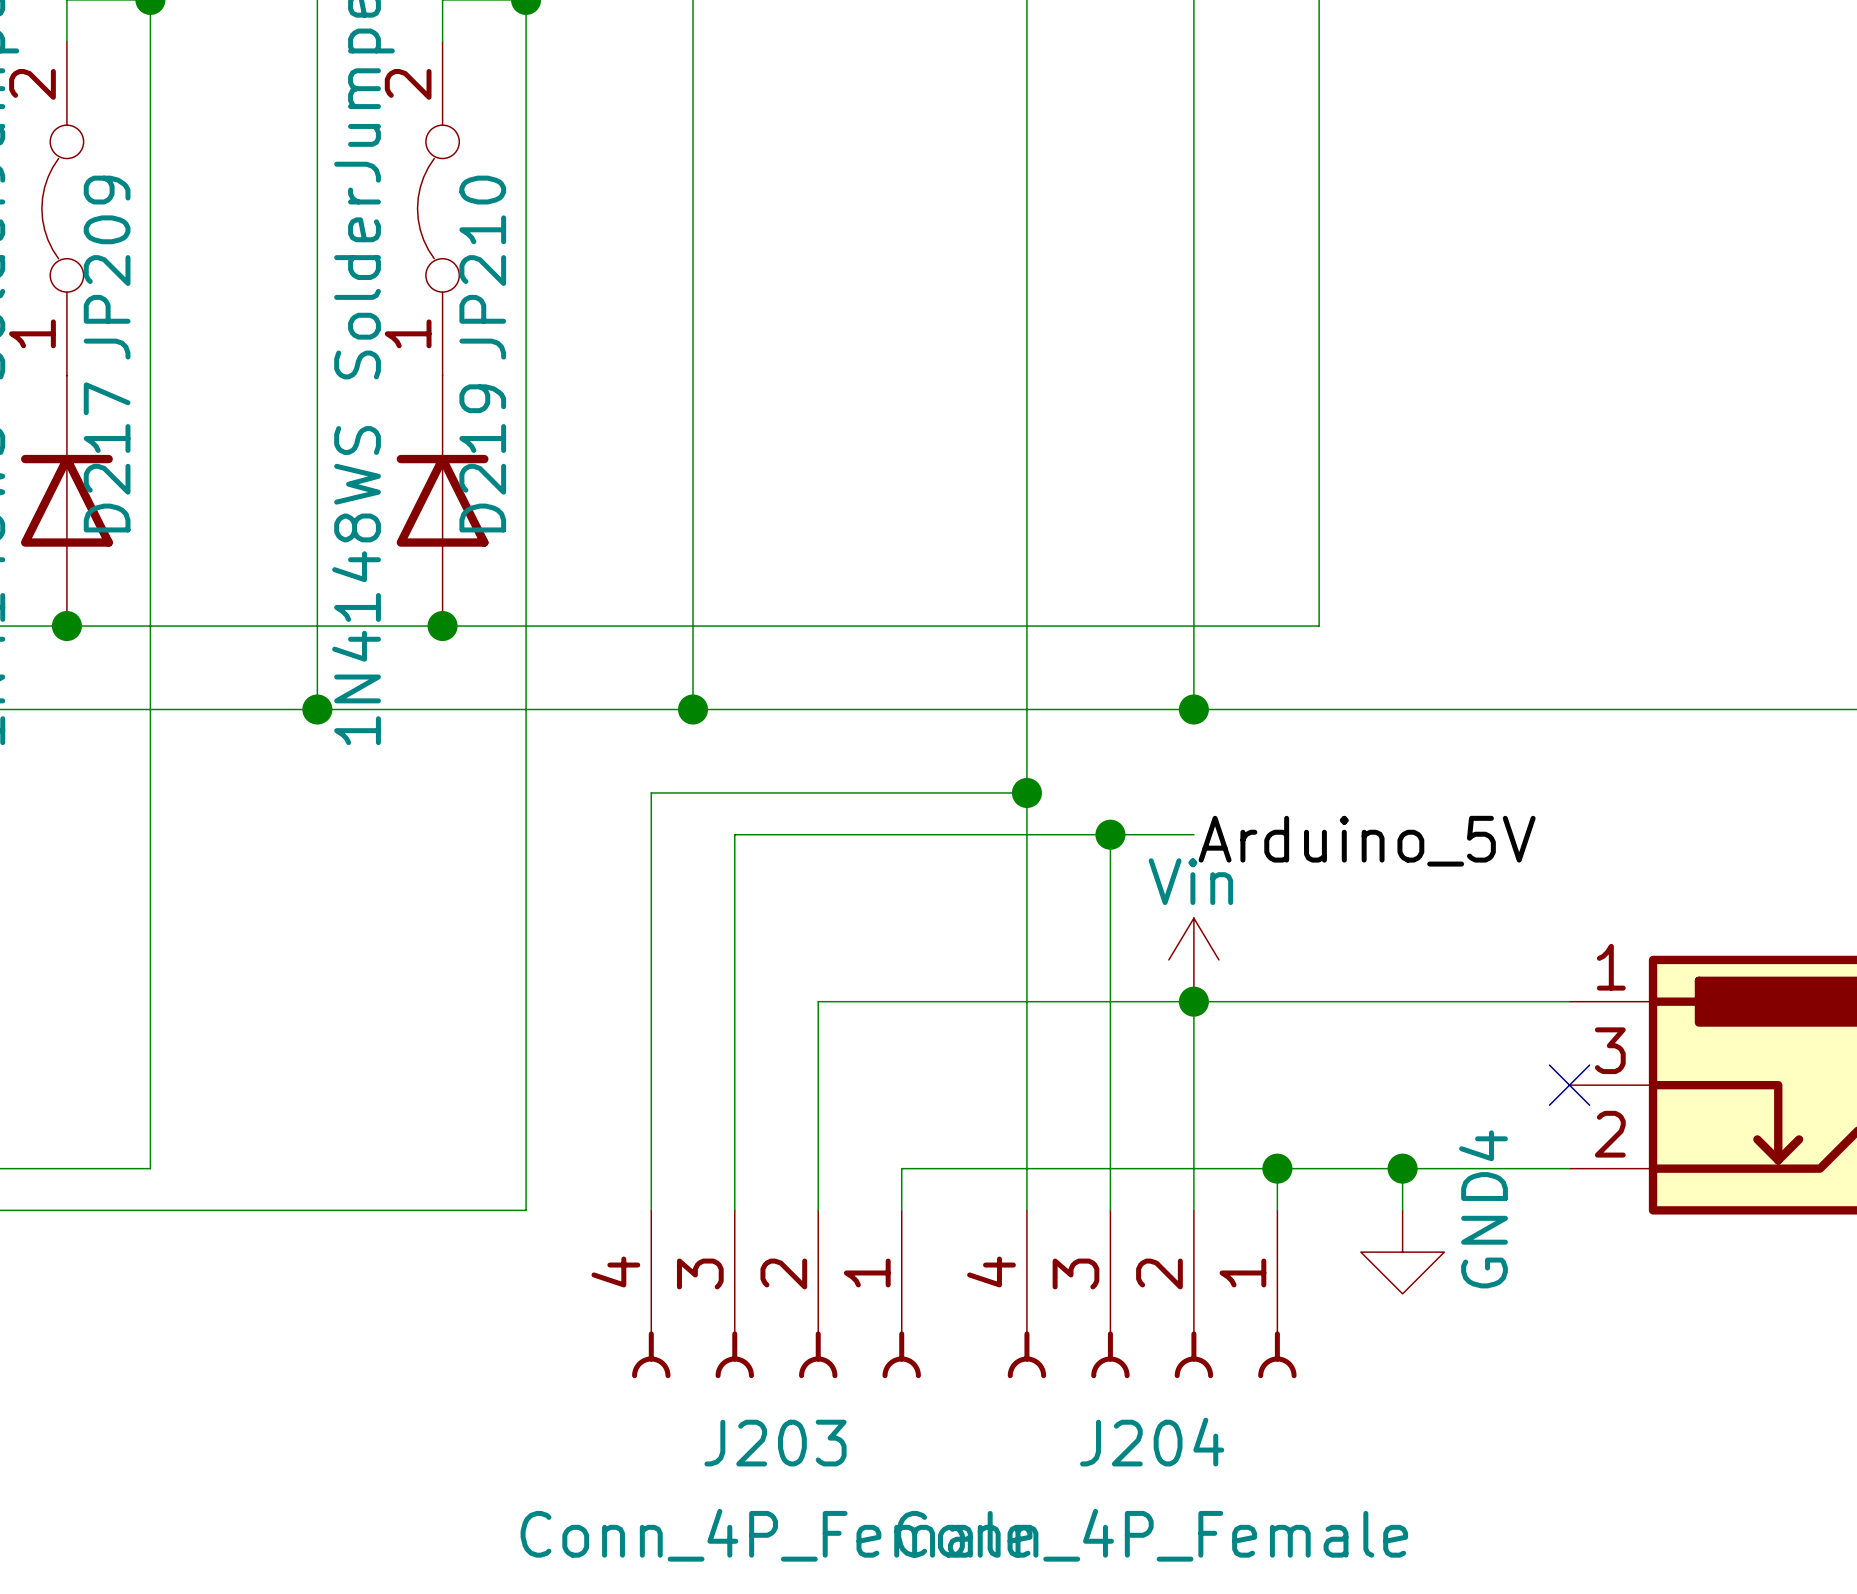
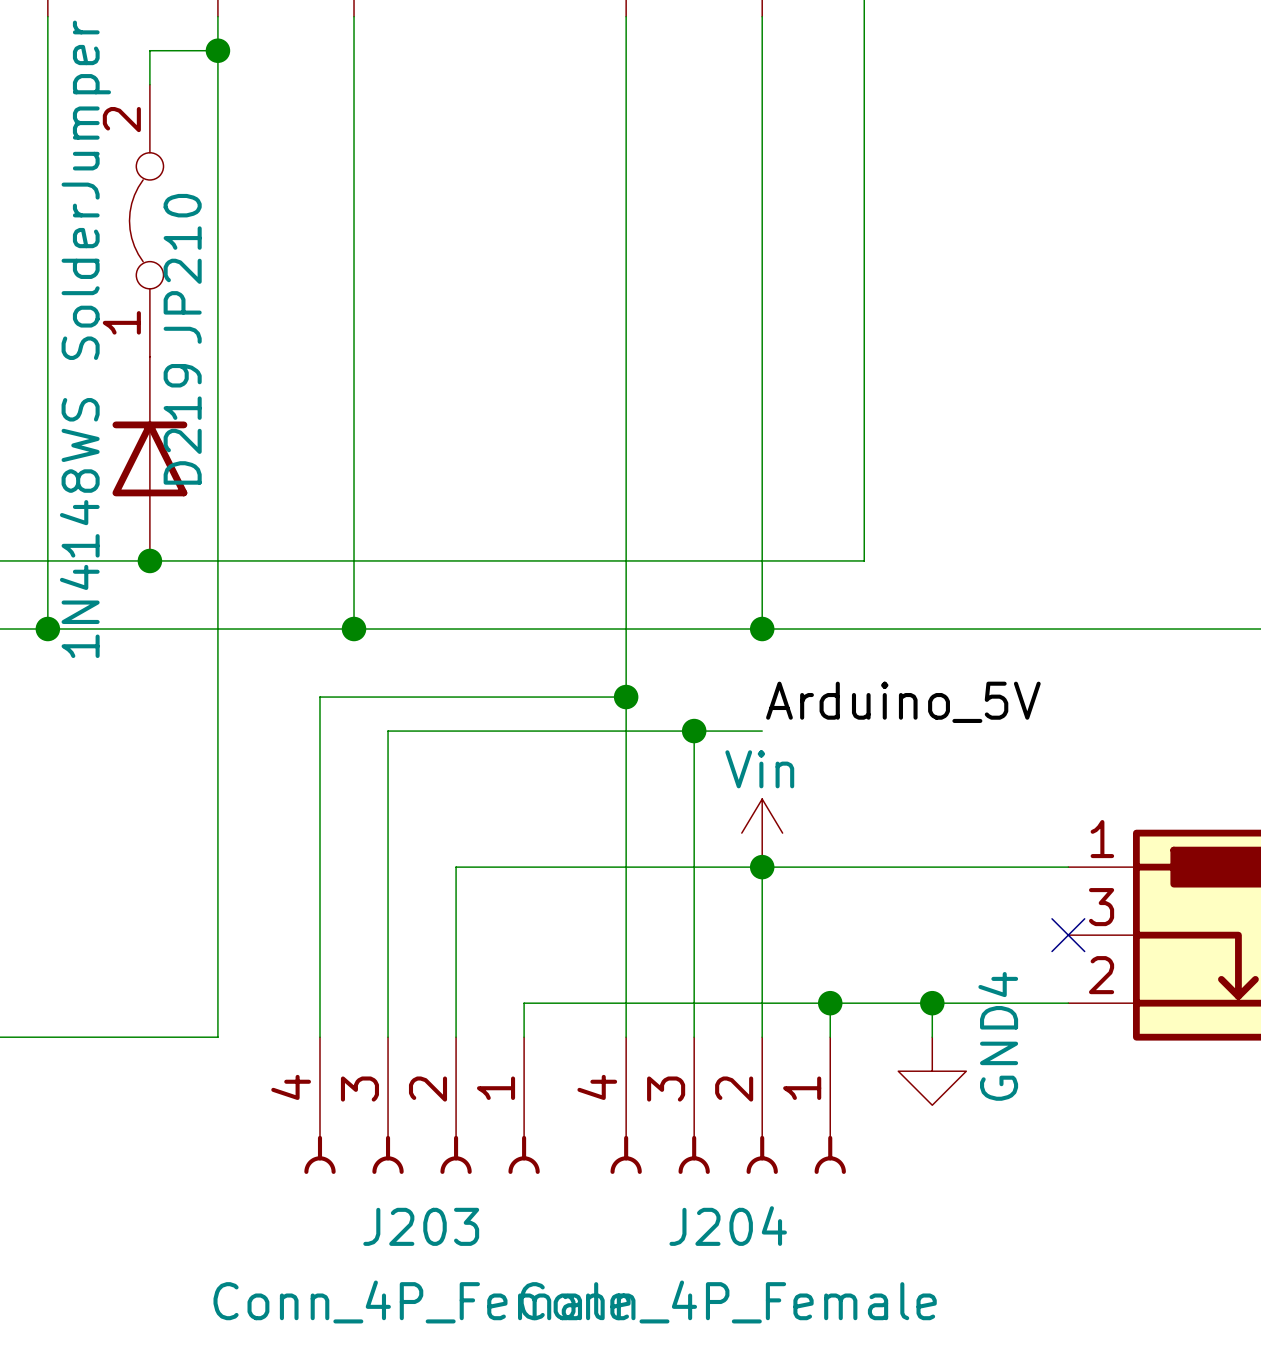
label position: Arduino_5V (1367, 841) -> Arduino_5V (903, 702)

